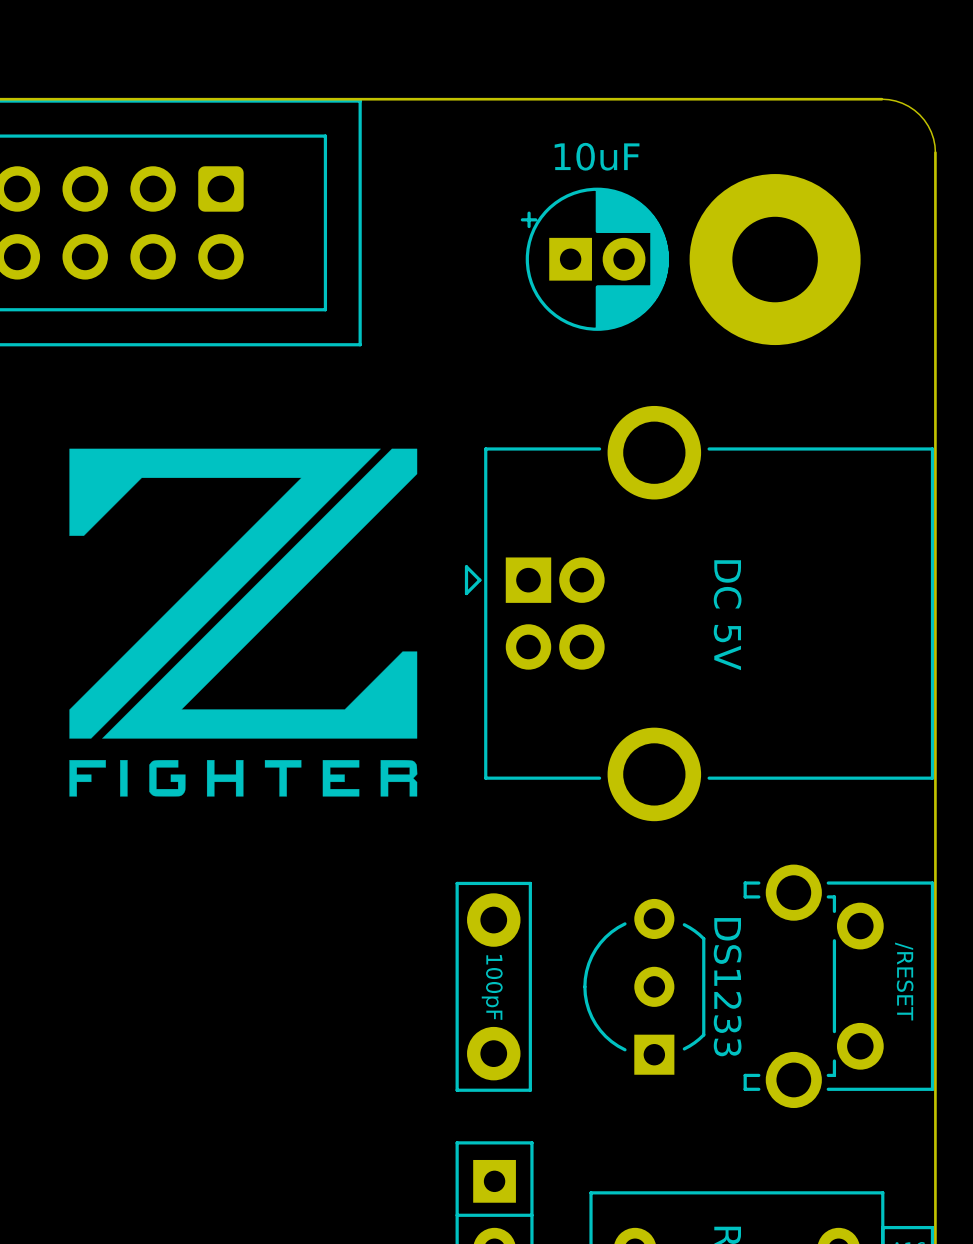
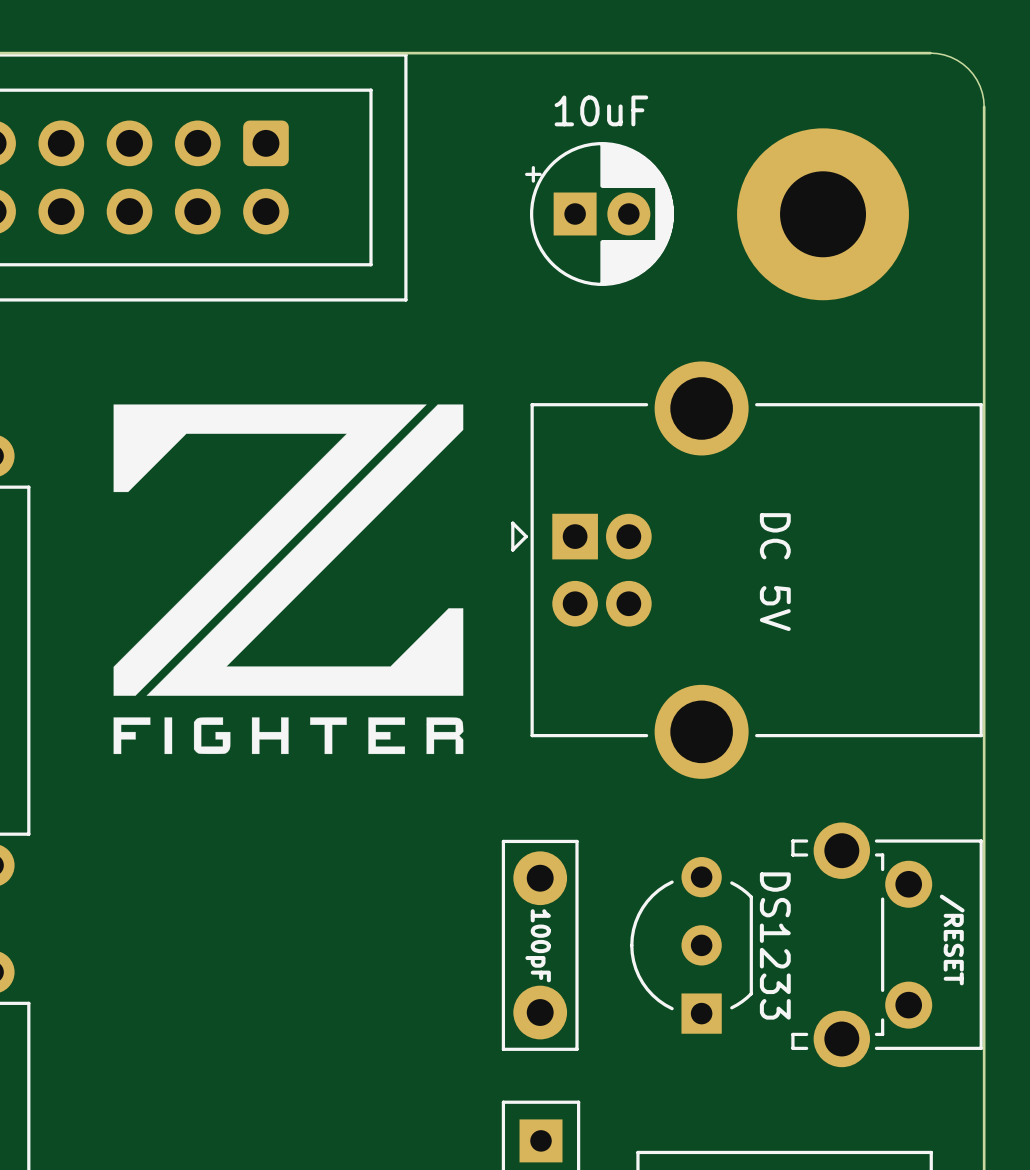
part position: (594, 259) -> (599, 213)

